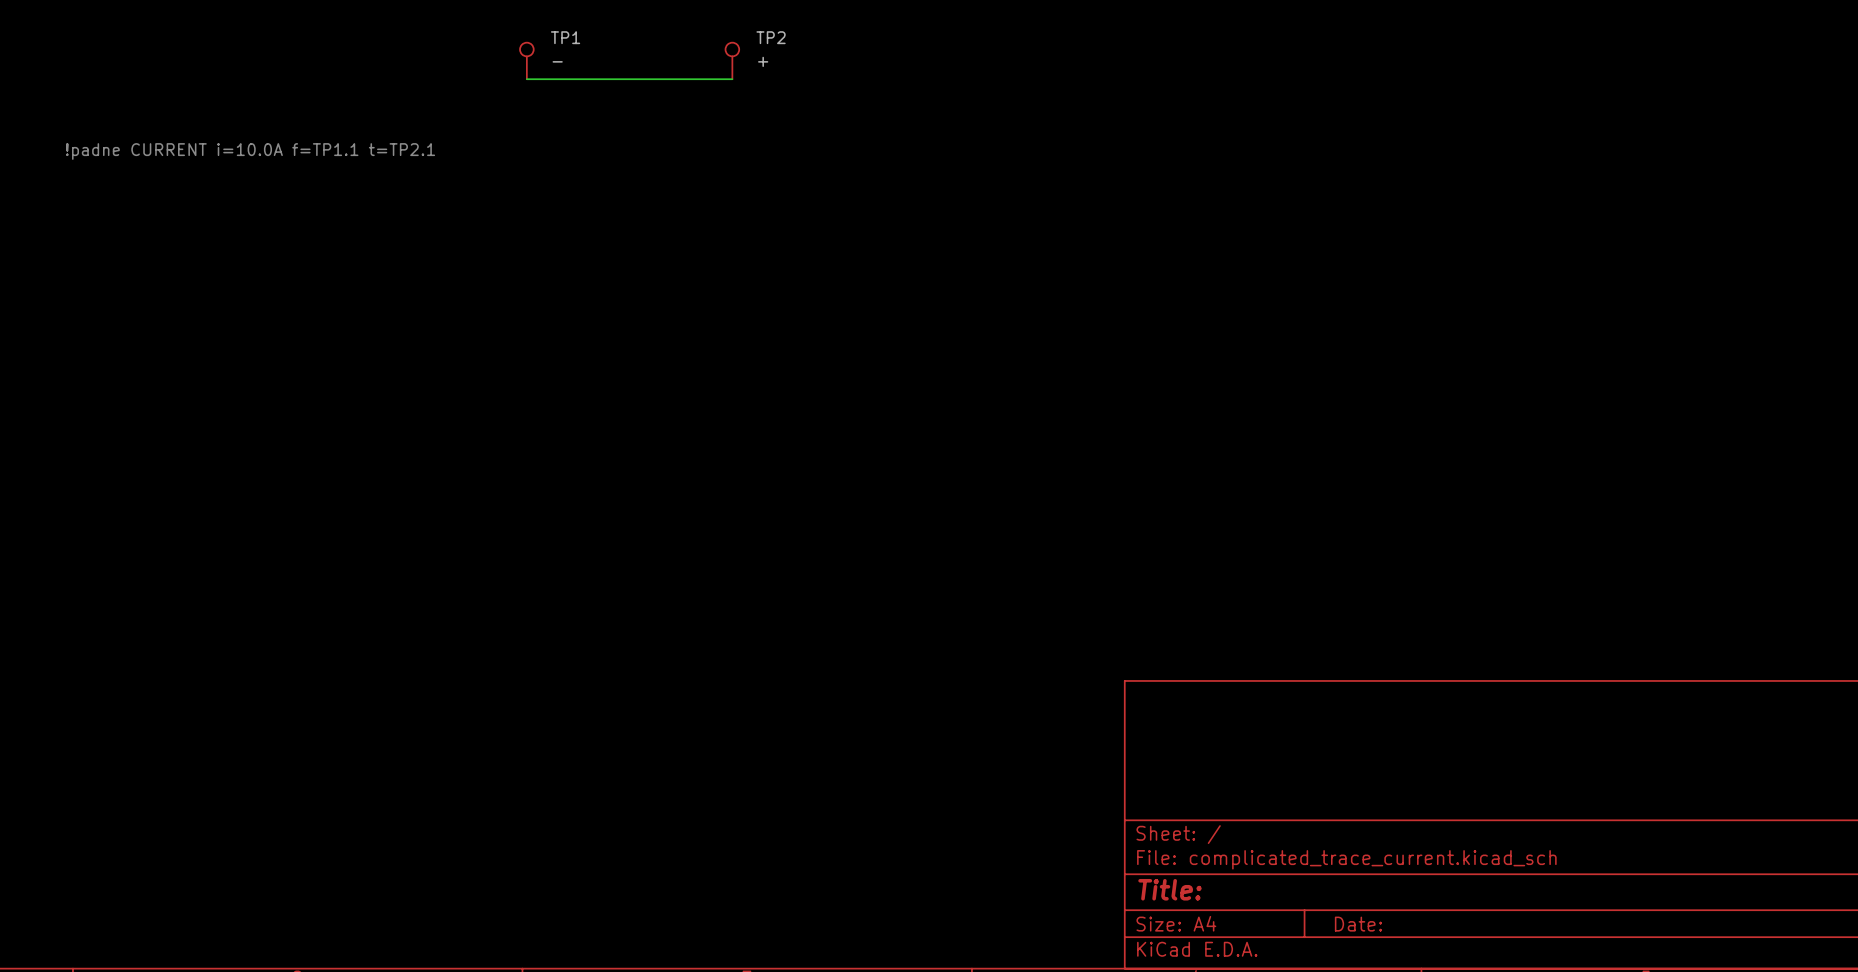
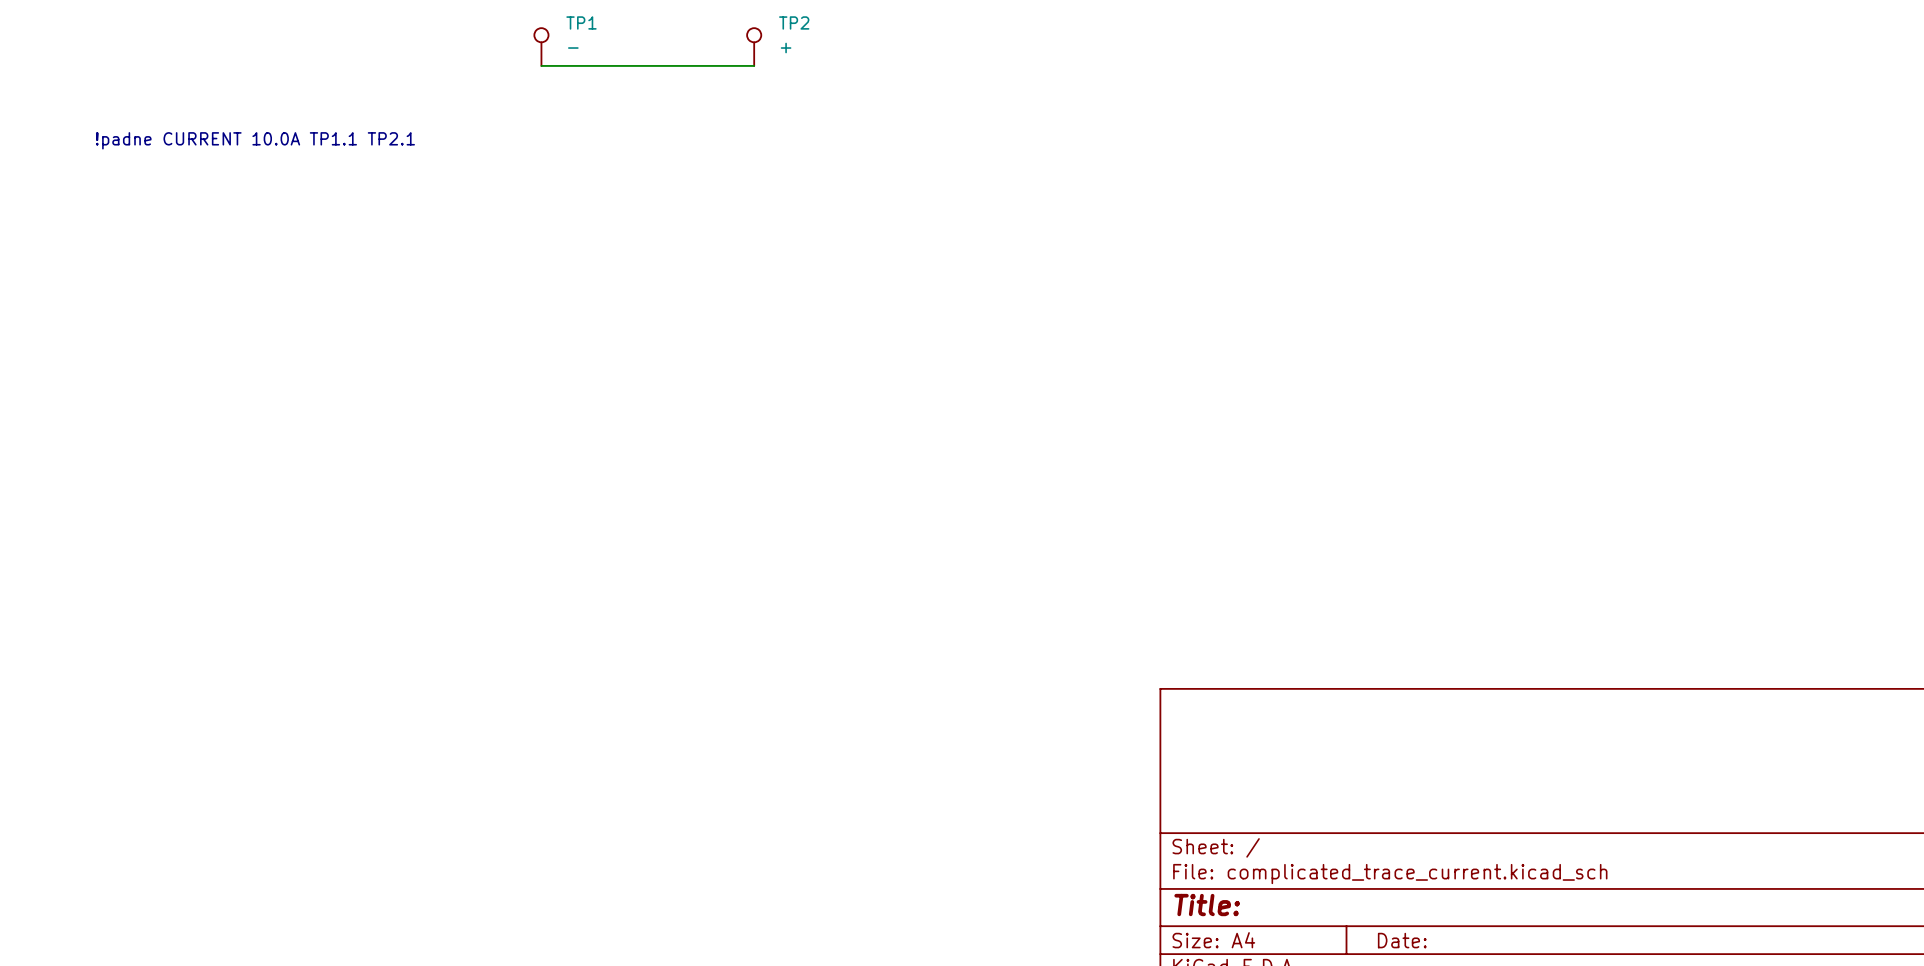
text: !padne CURRENT i=10.0A f=TP1.1 t=TP2.1 (250, 151) -> !padne CURRENT 10.0A TP1.1 TP2.1 (255, 140)

